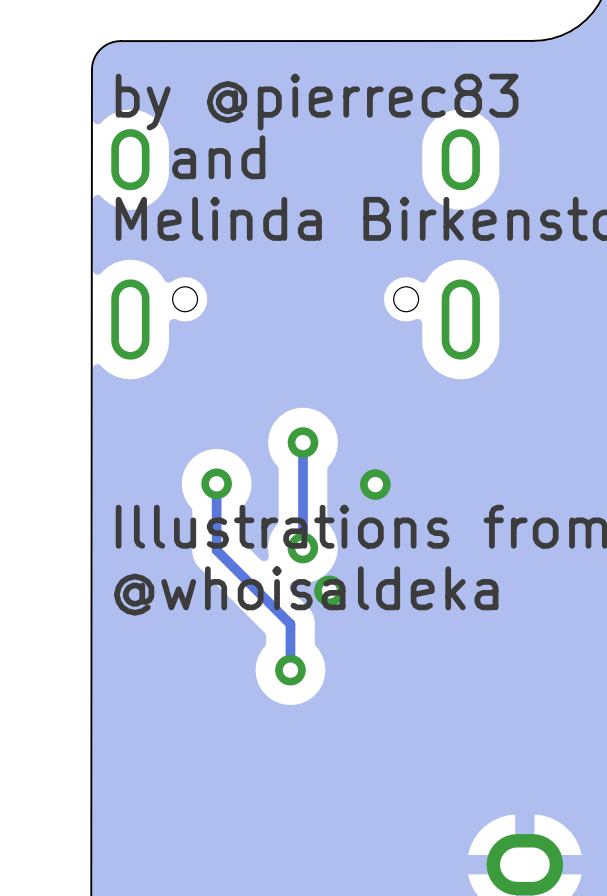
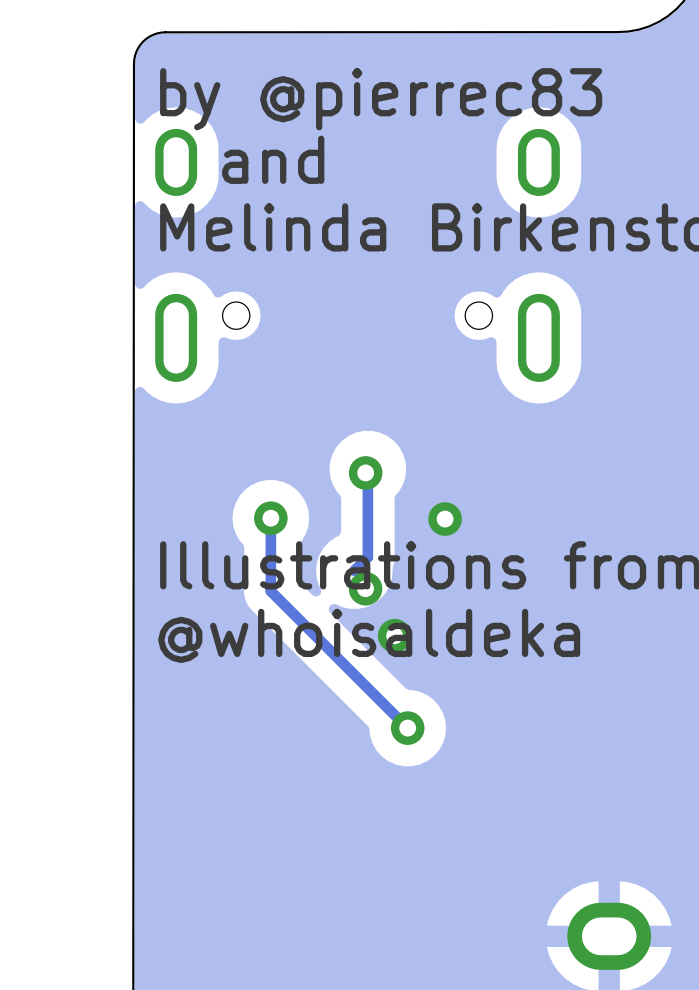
track: none -> (367, 469) (367, 557) (354, 570)
track: (303, 442) (303, 547) -> none
track: (290, 624) (290, 670) -> (351, 672) (407, 728)
via position: (290, 670) -> (407, 728)

